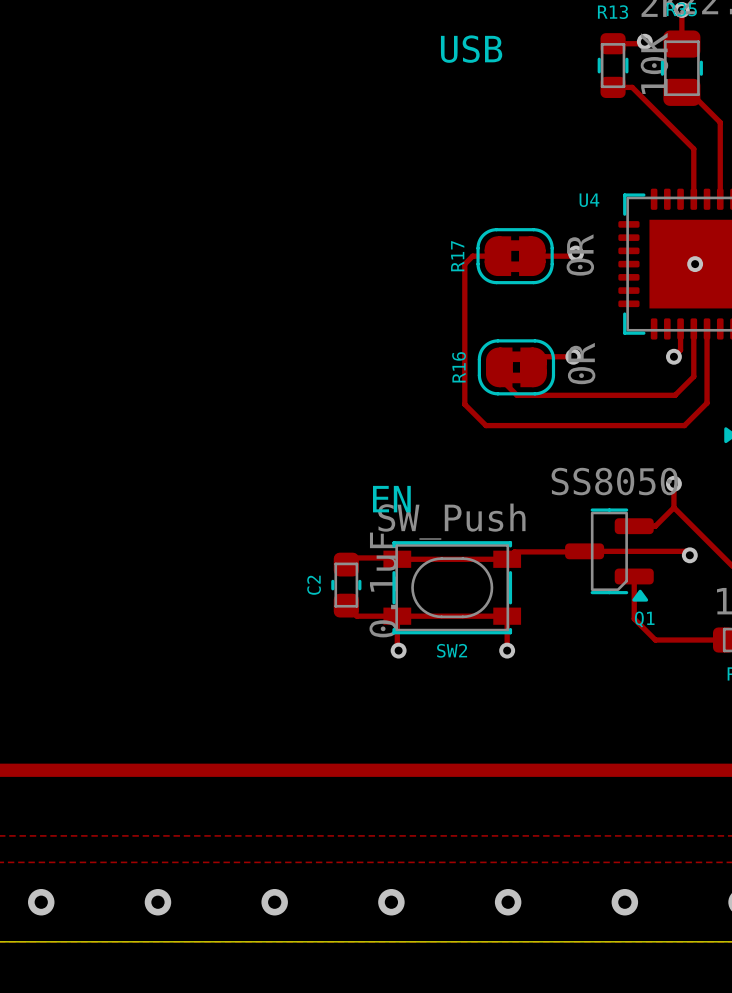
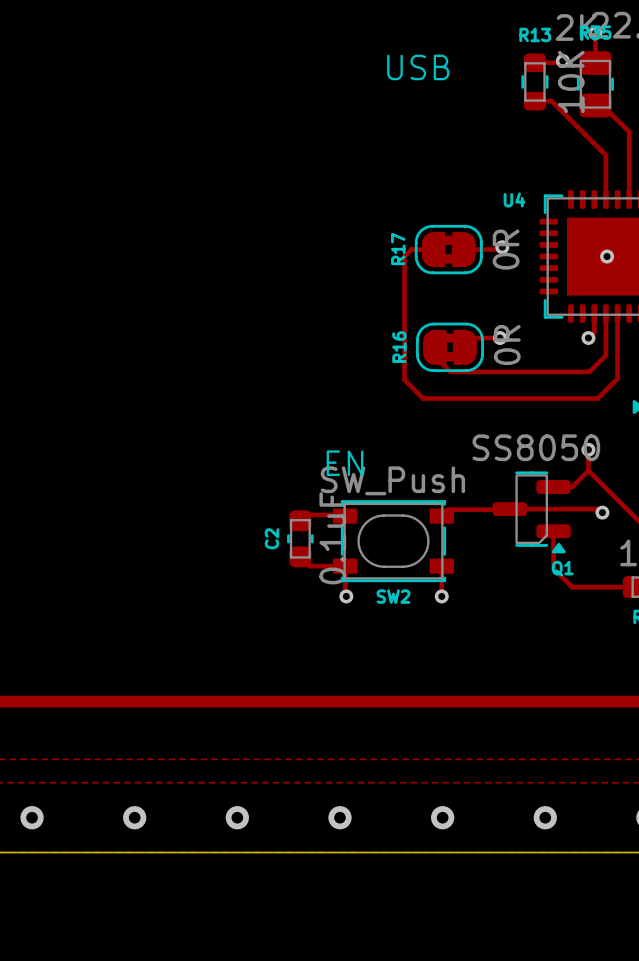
track: (397, 559) (507, 559) -> none
track: (397, 616) (507, 616) -> none

